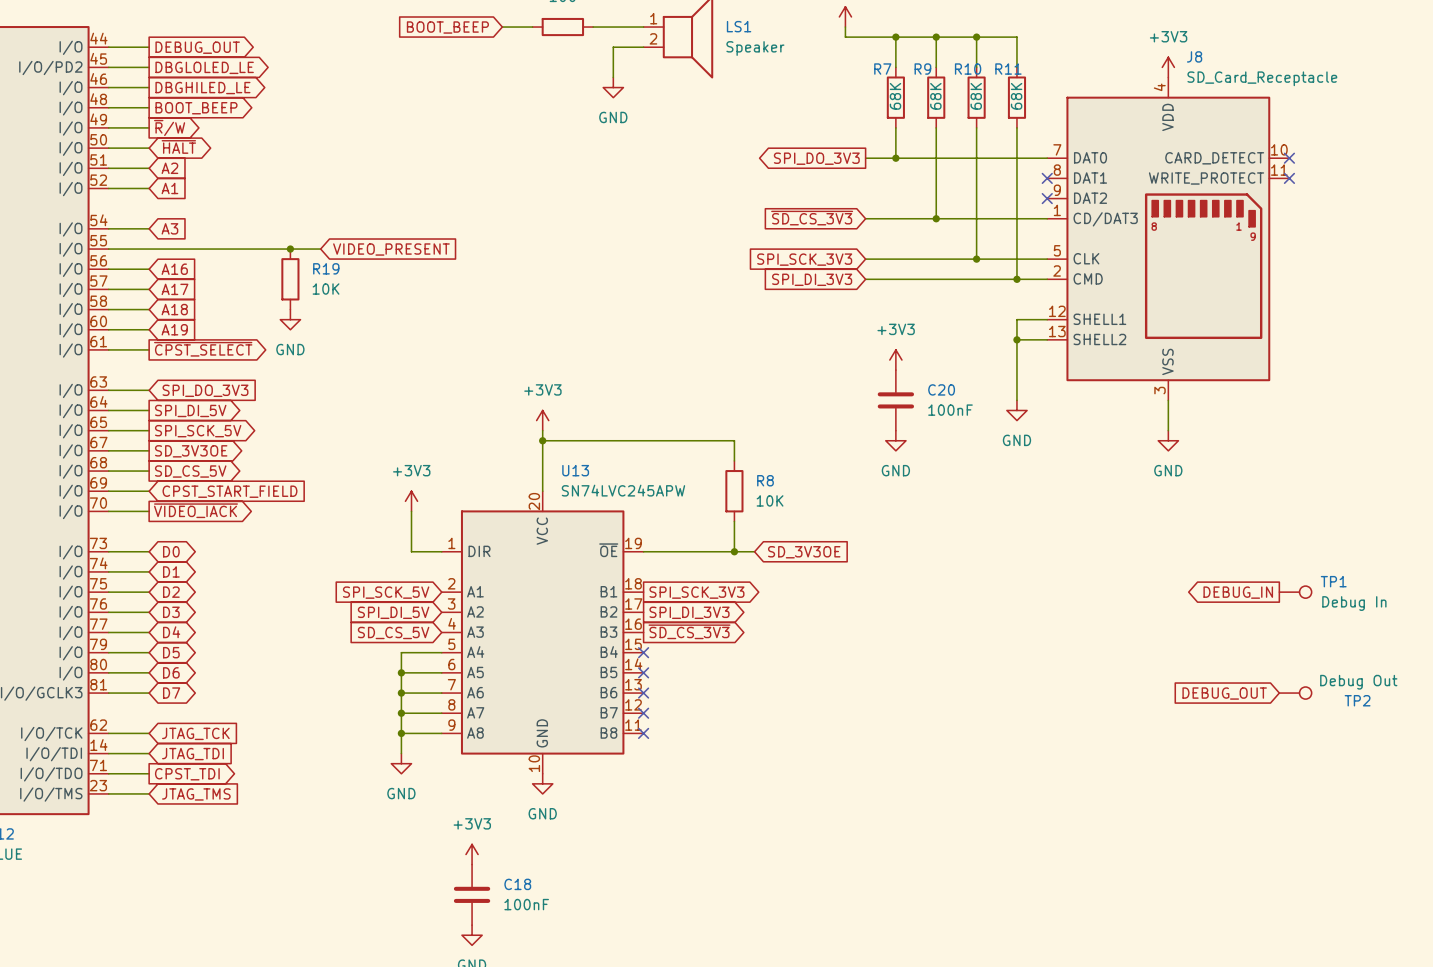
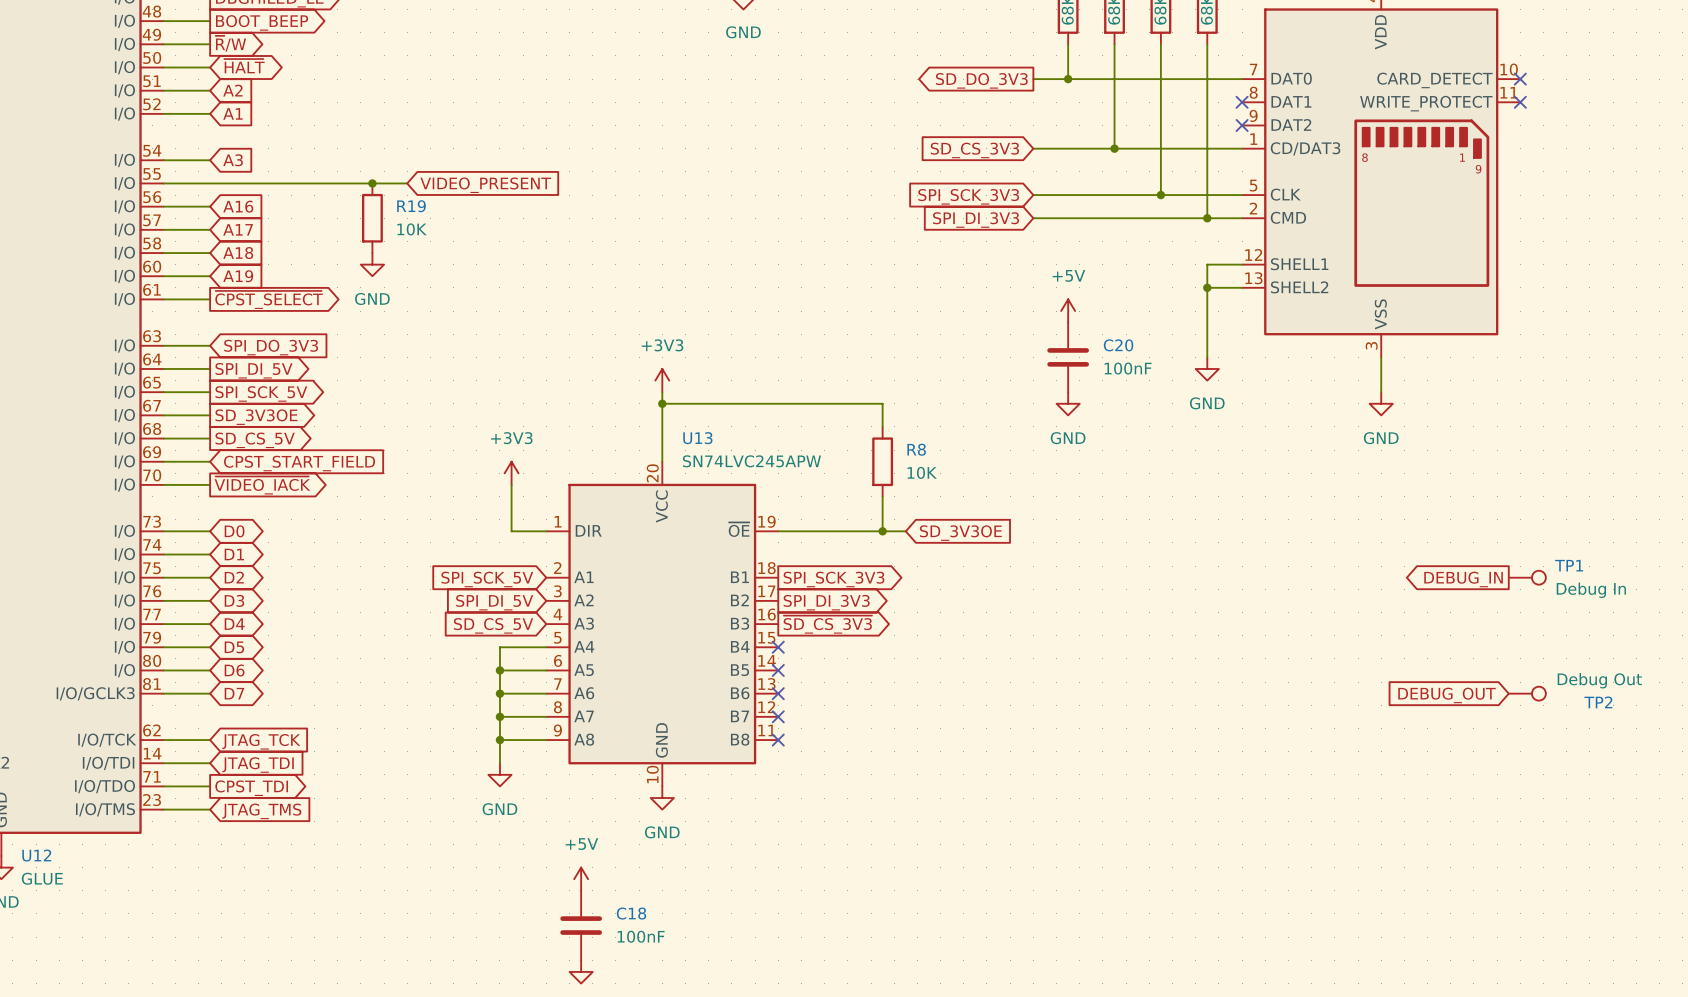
global label: SPI_DO_3V3 (816, 158) -> SD_DO_3V3 (981, 80)
global label: ~{SD_CS_3V3} (812, 218) -> SD_CS_3V3 (974, 150)
power symbol: +3V3 (895, 360) -> +5V (1068, 311)
power symbol: +3V3 (472, 854) -> +5V (581, 879)

